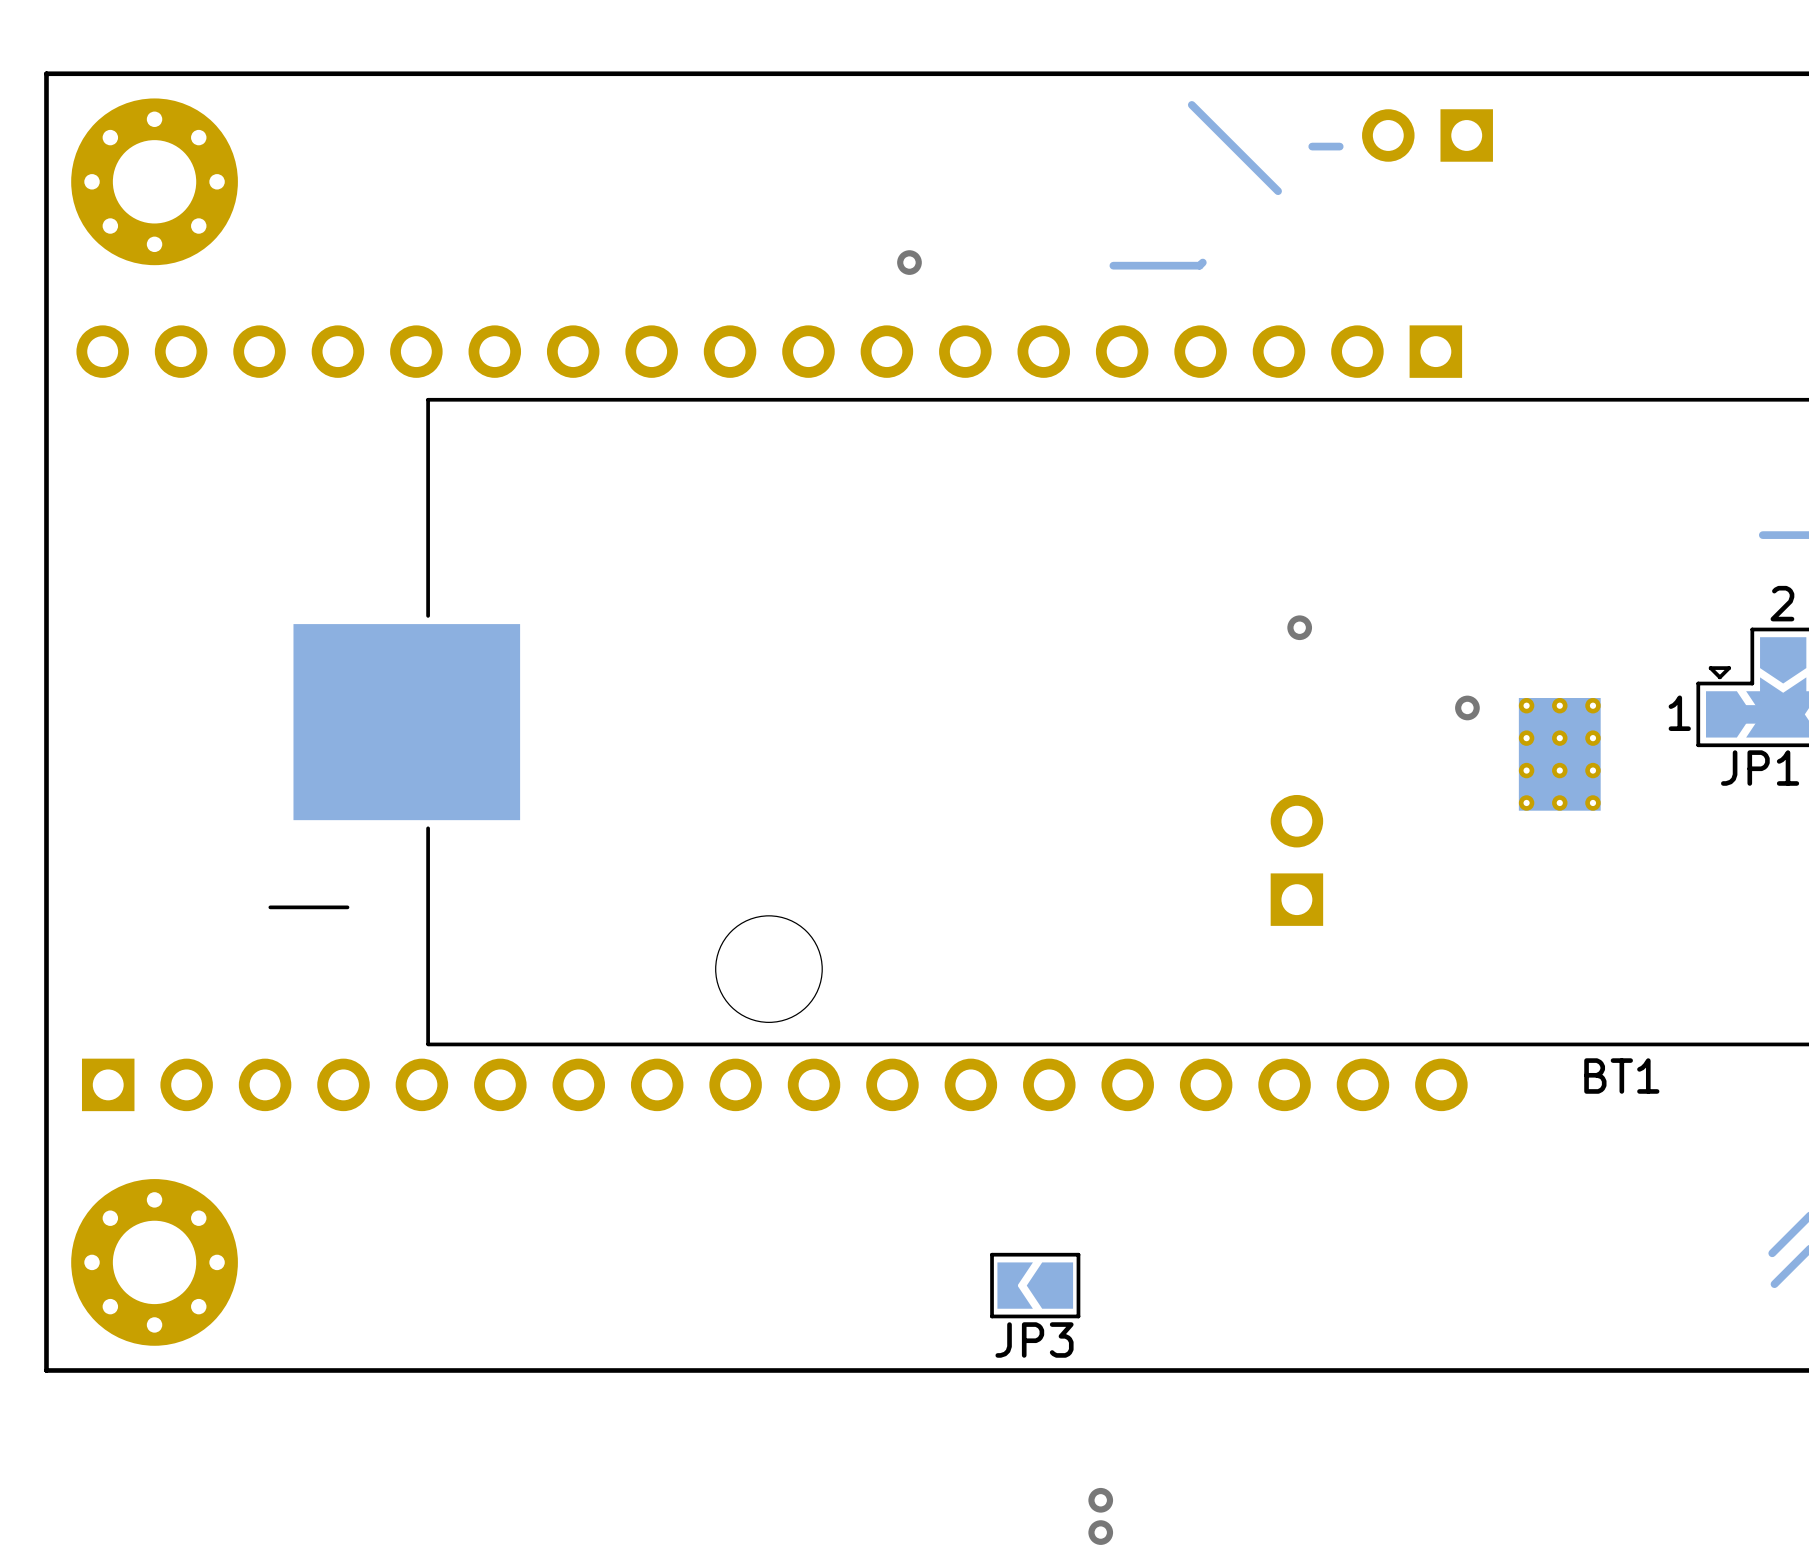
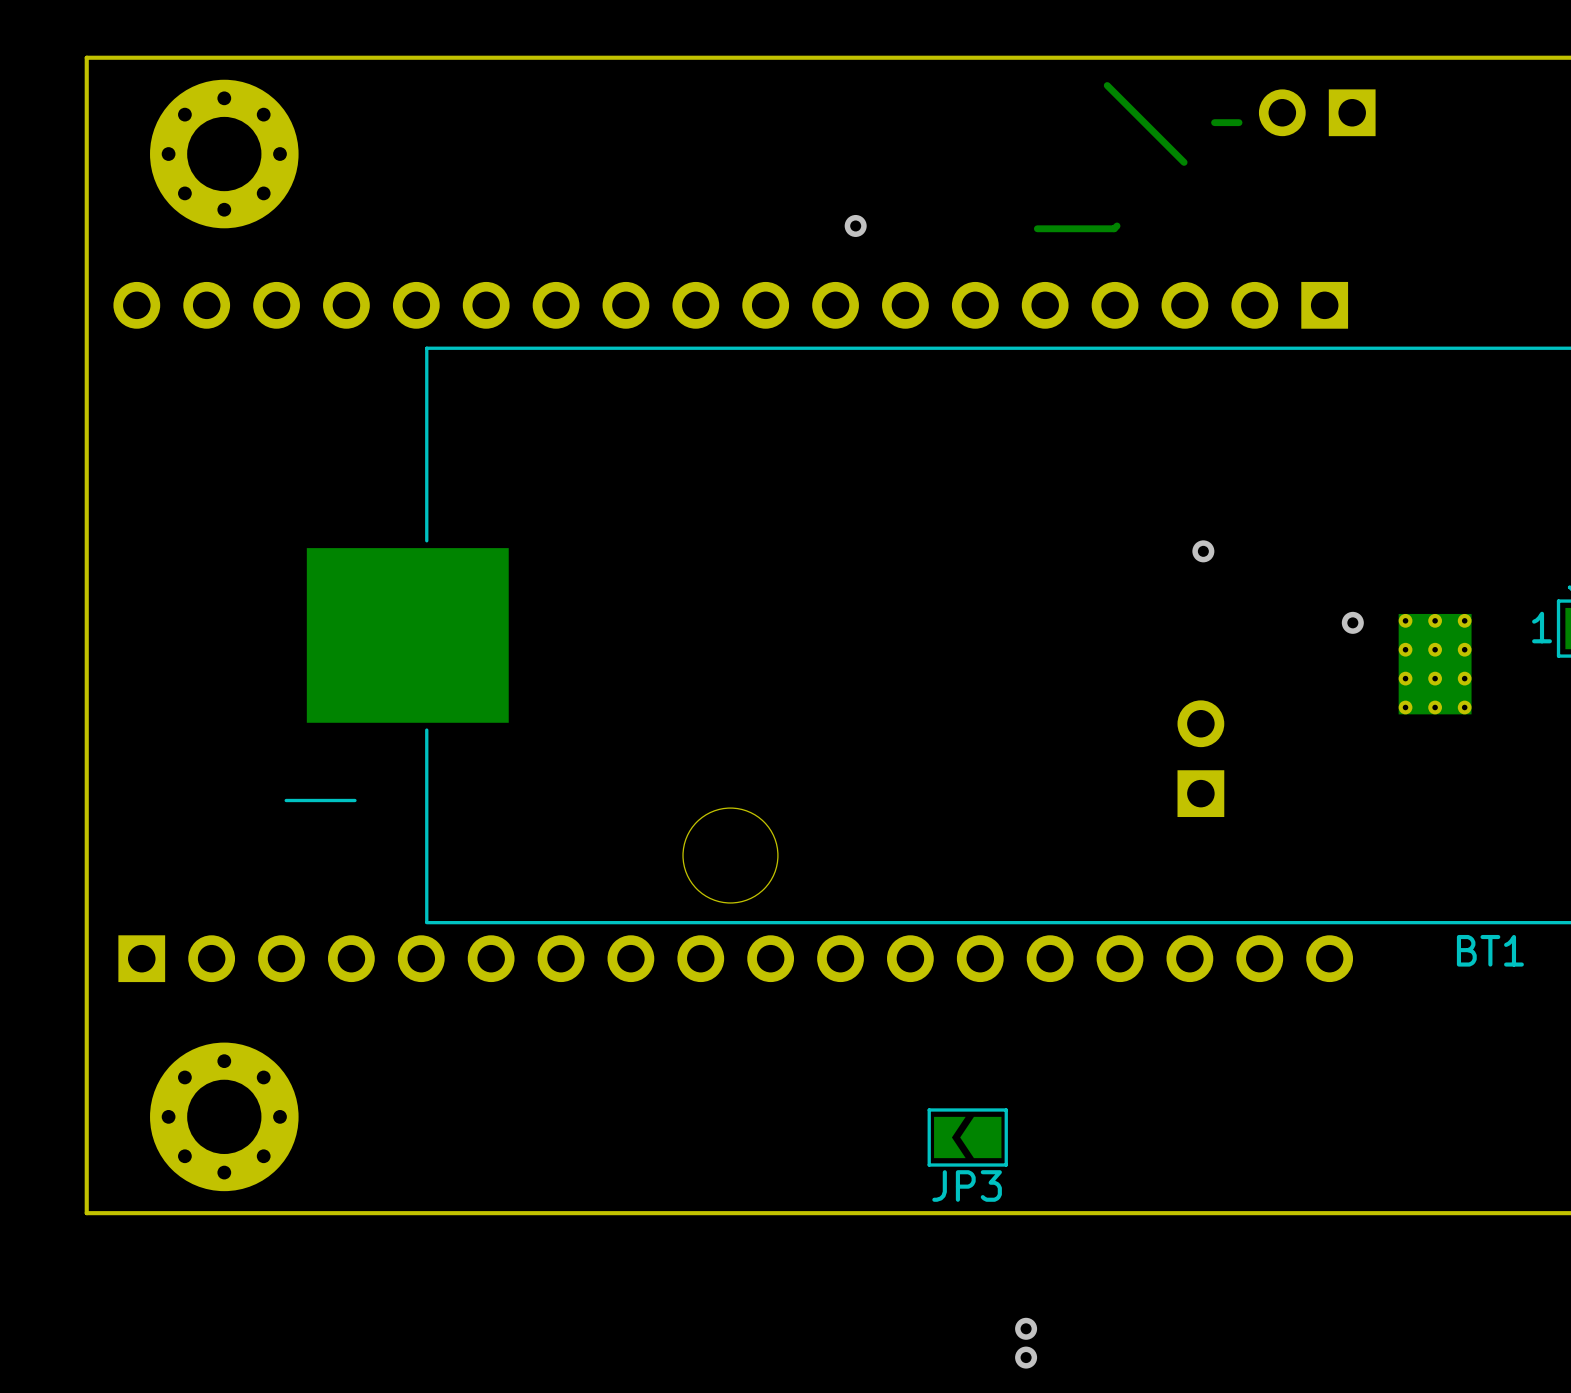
part position: (154, 181) -> (224, 154)
part position: (154, 1262) -> (224, 1116)

